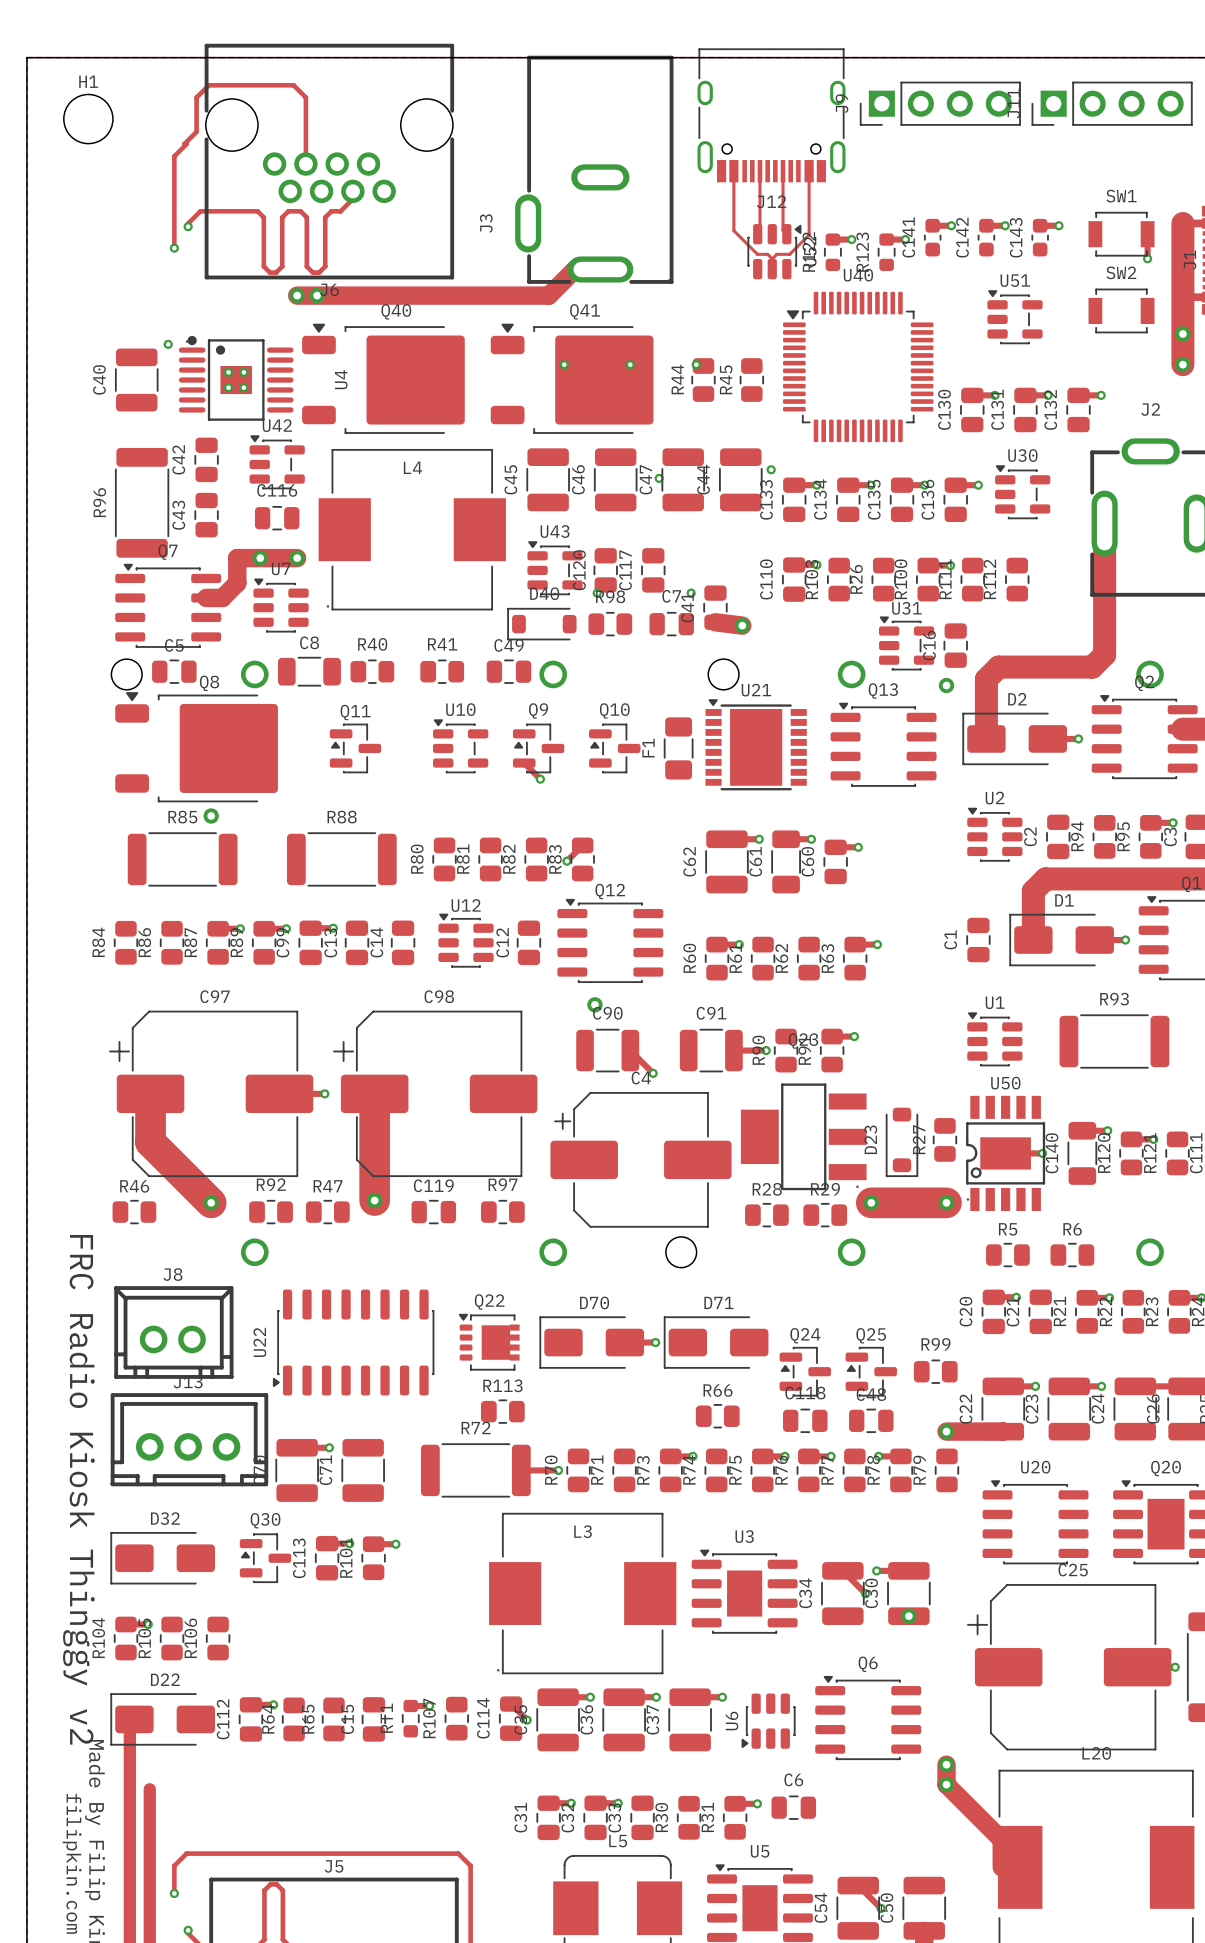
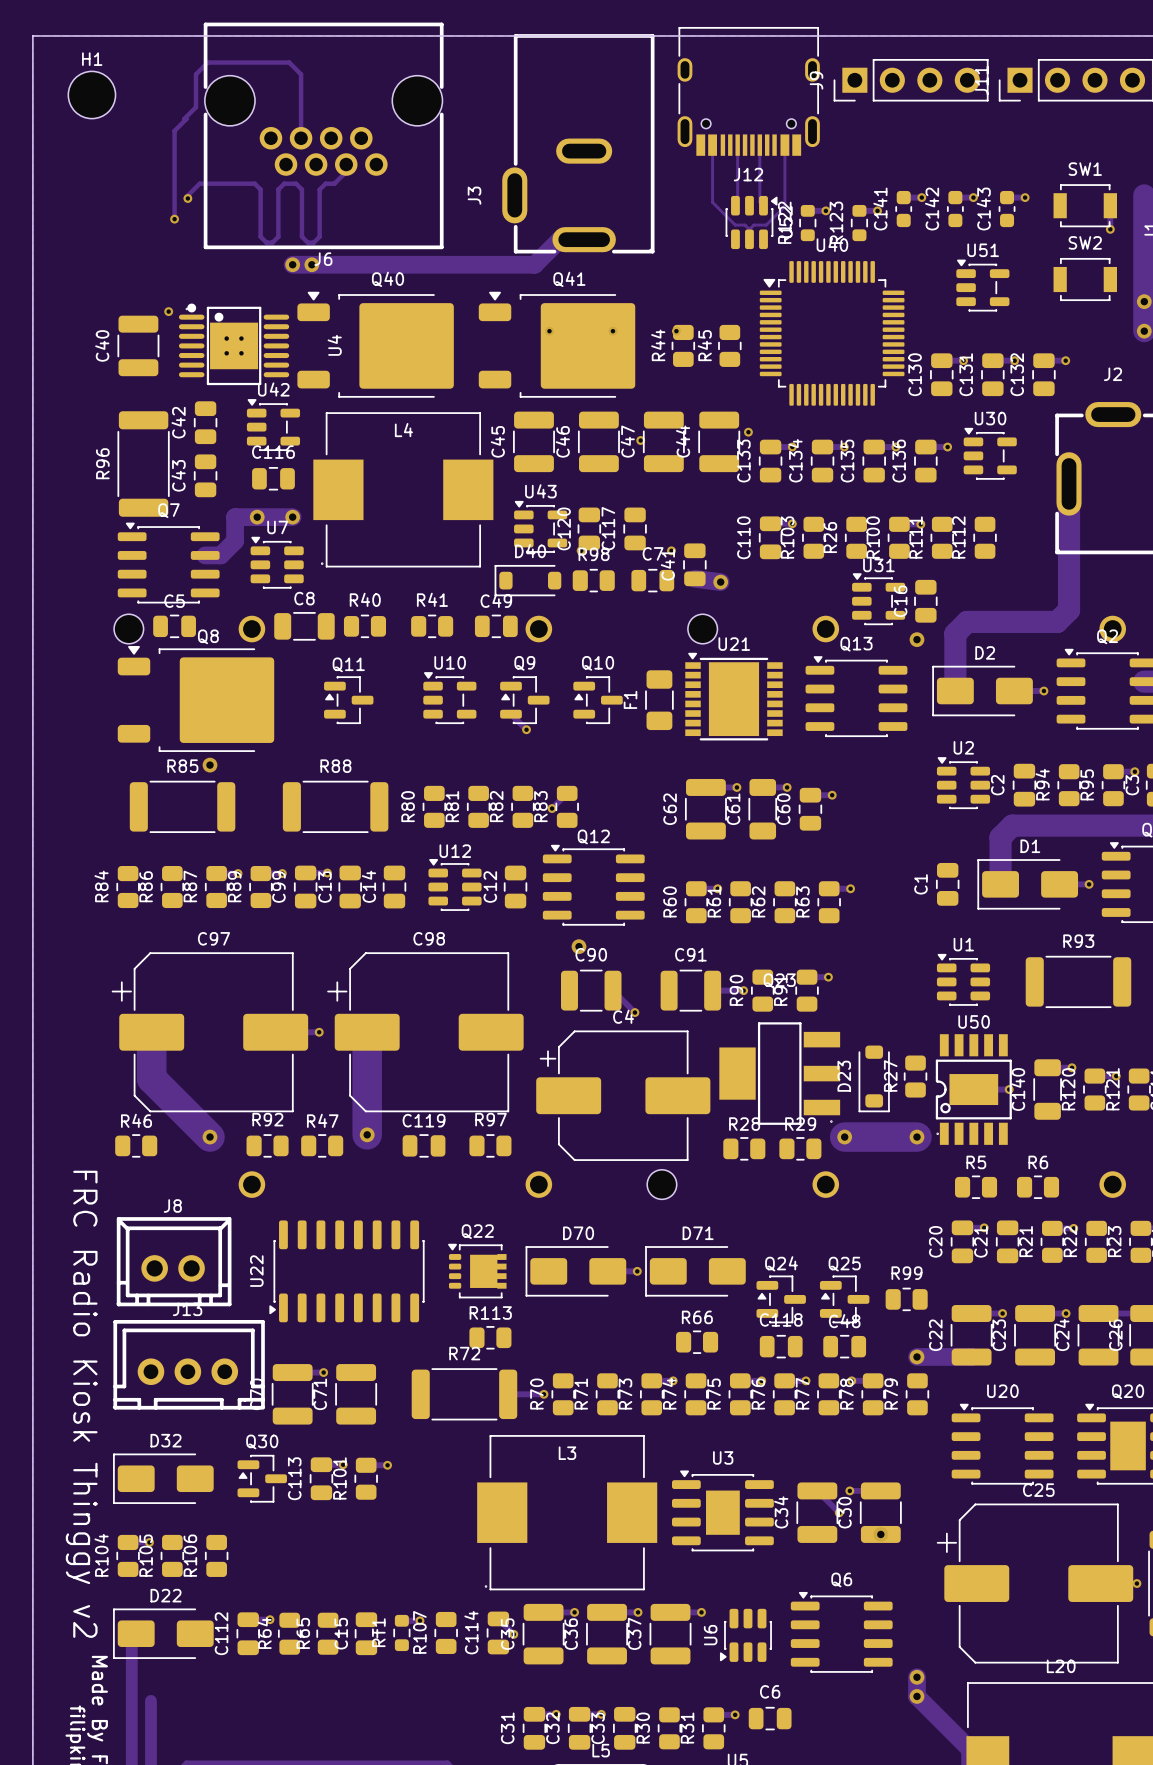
U4 footprint: [178, 335, 294, 421] -> [178, 303, 290, 386]

